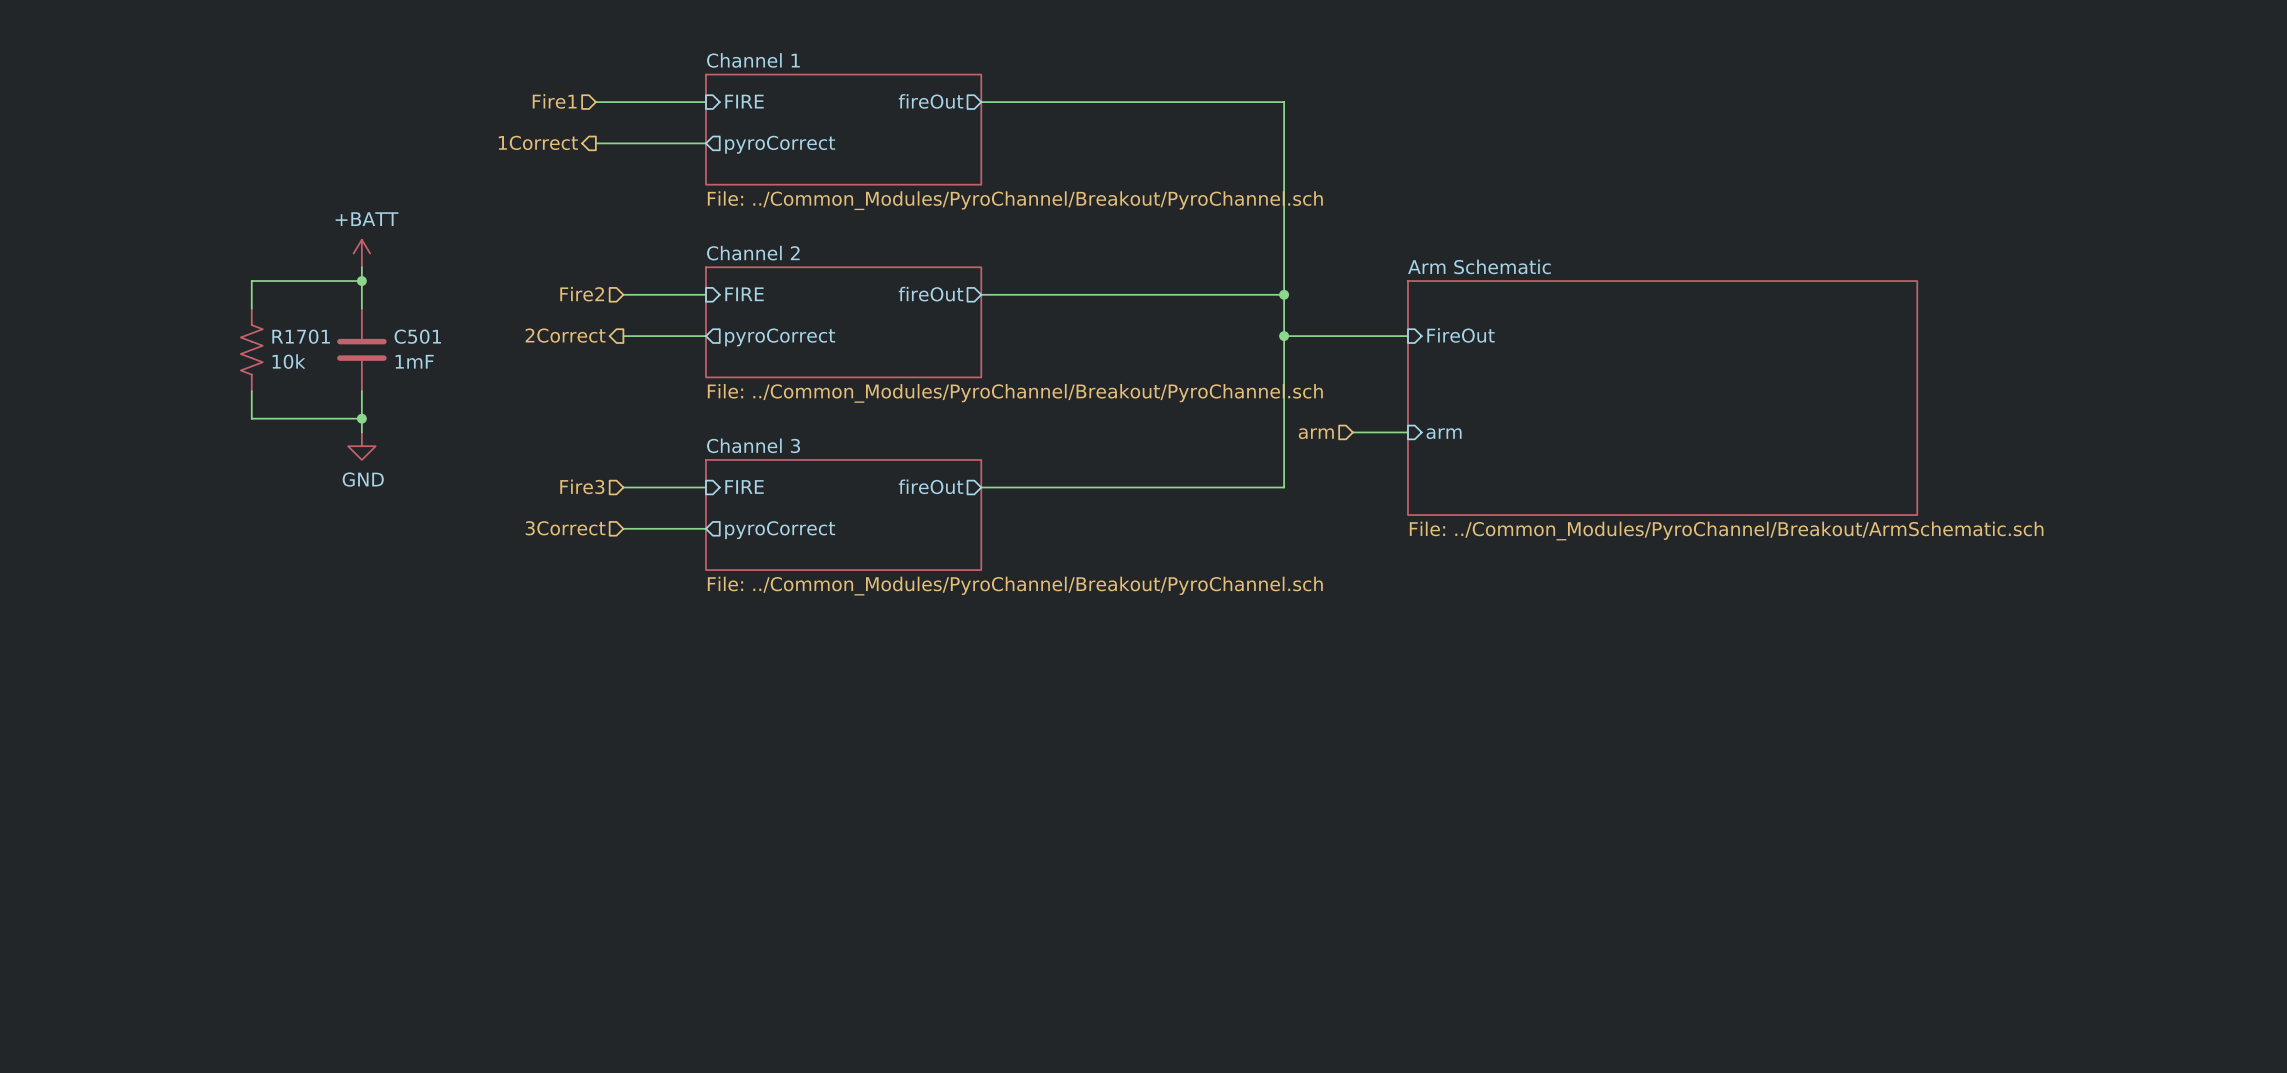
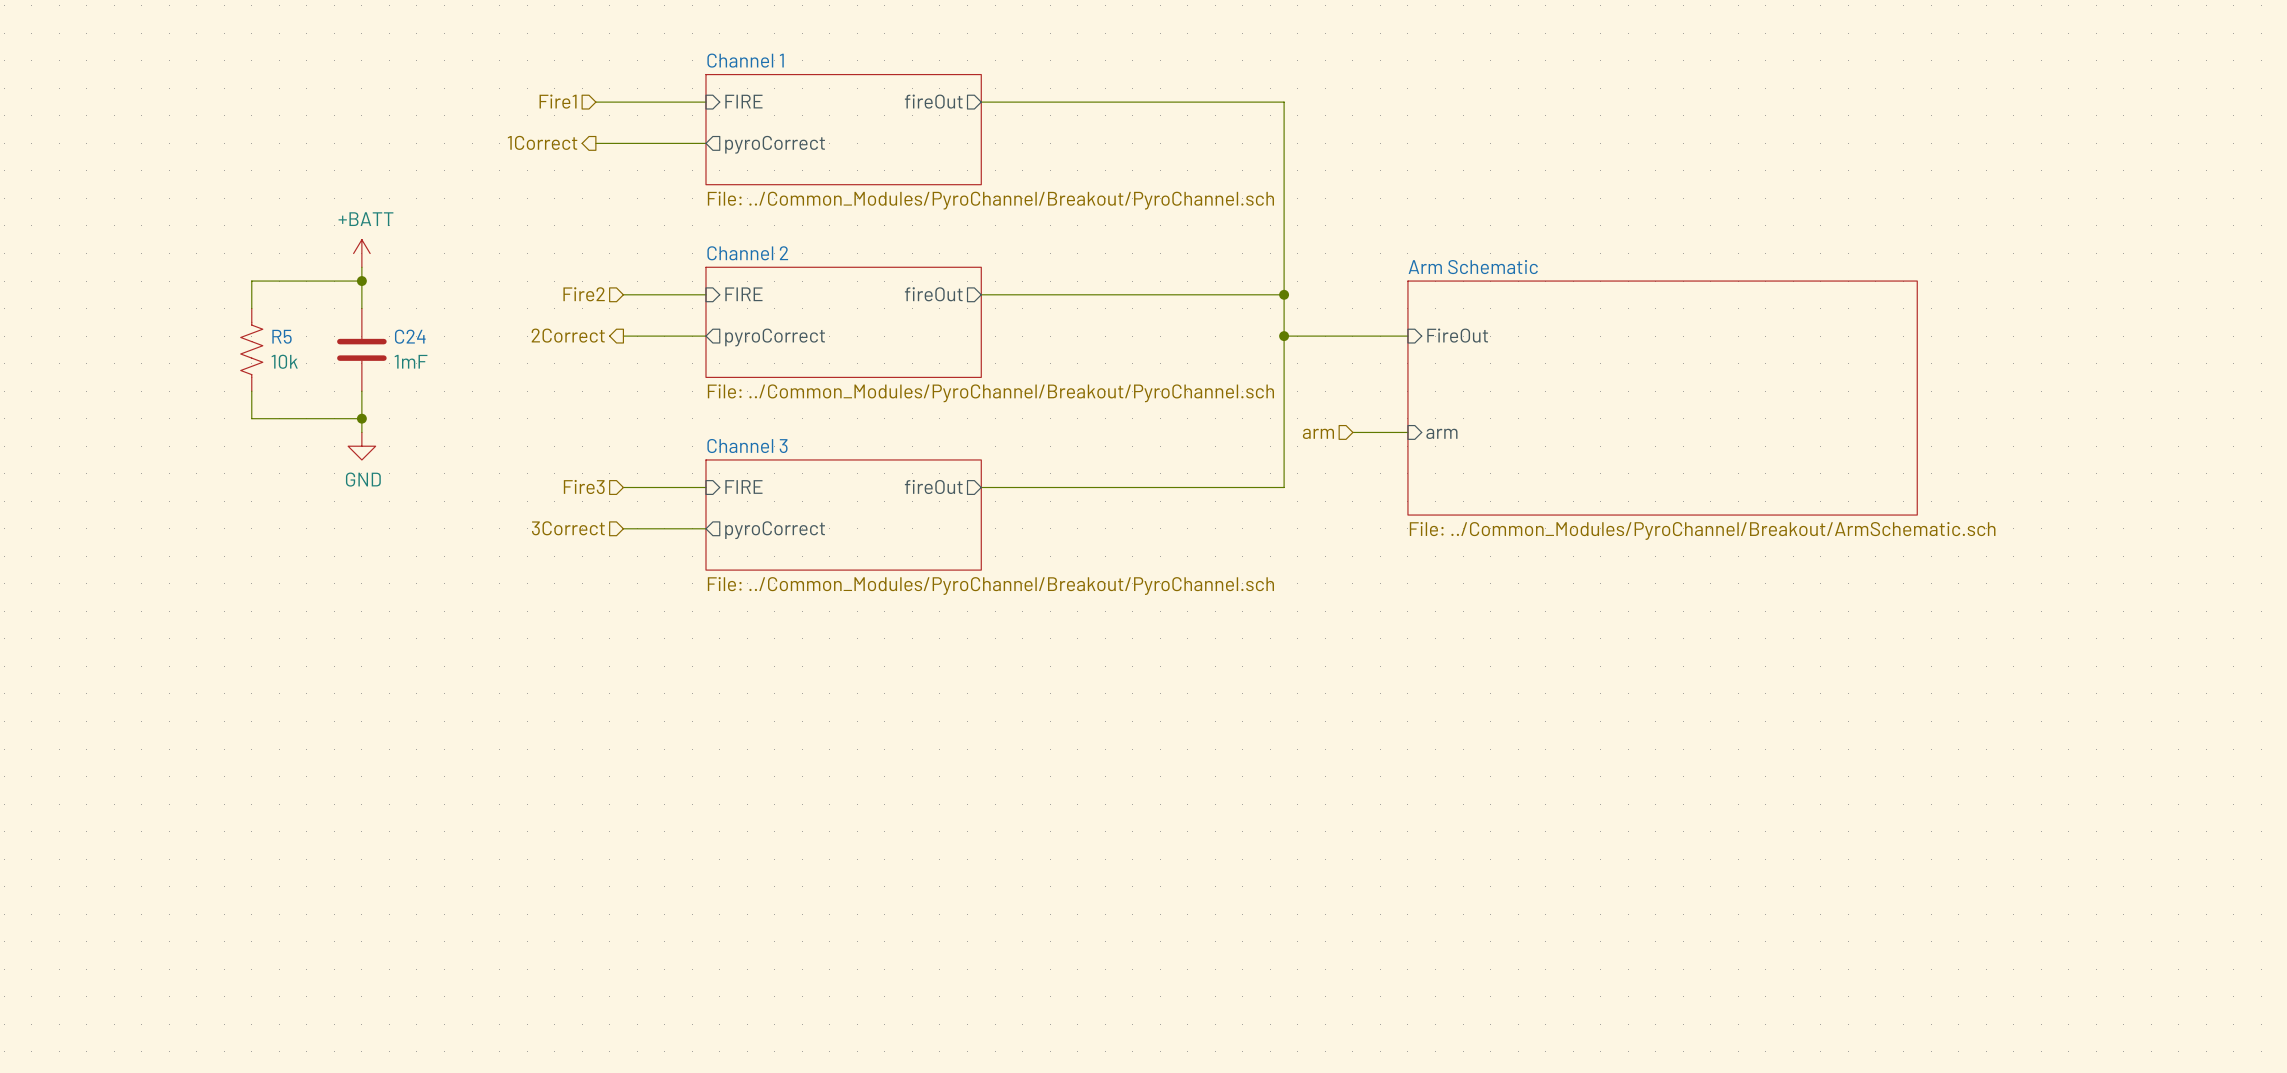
R1701 name: R1701 (301, 336) -> R5 (281, 336)
C501 name: C501 (417, 336) -> C24 (410, 336)

